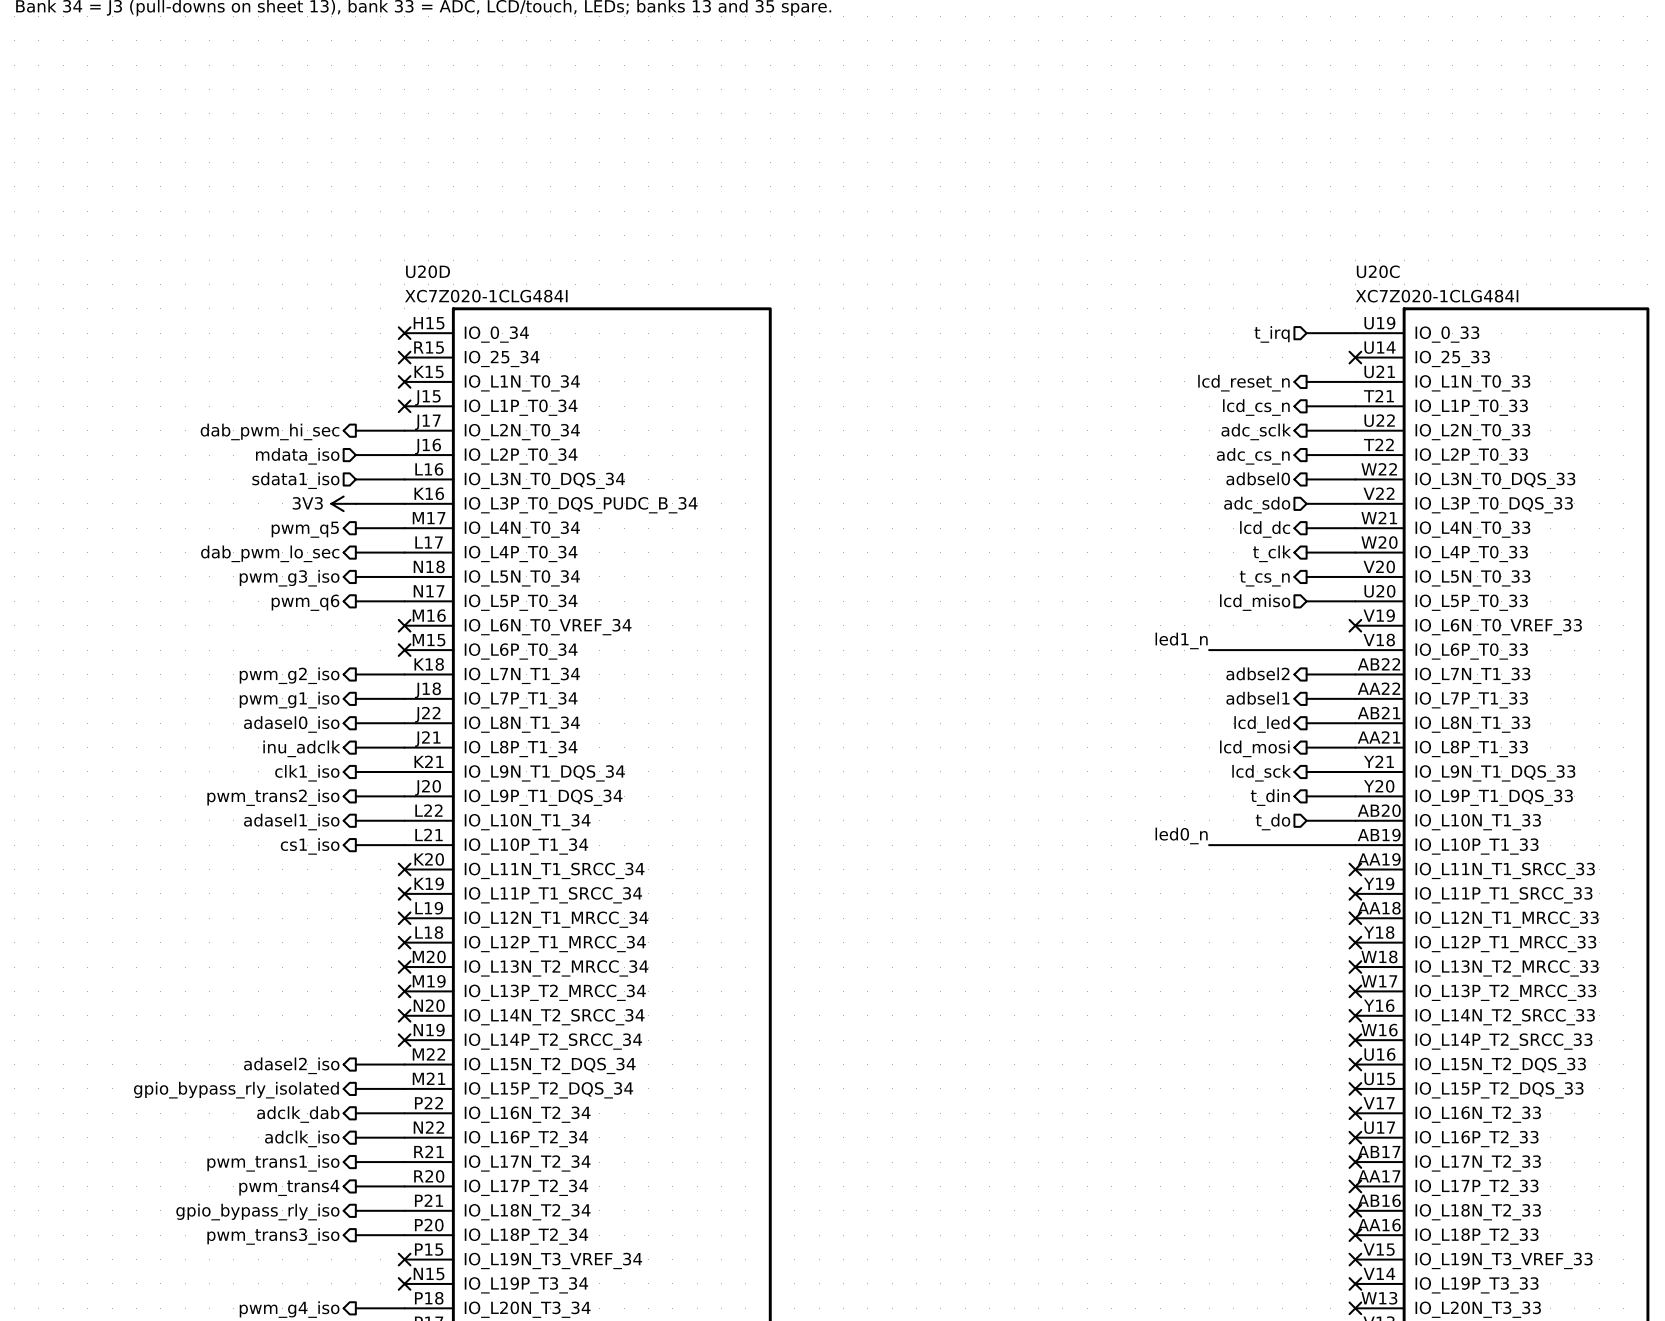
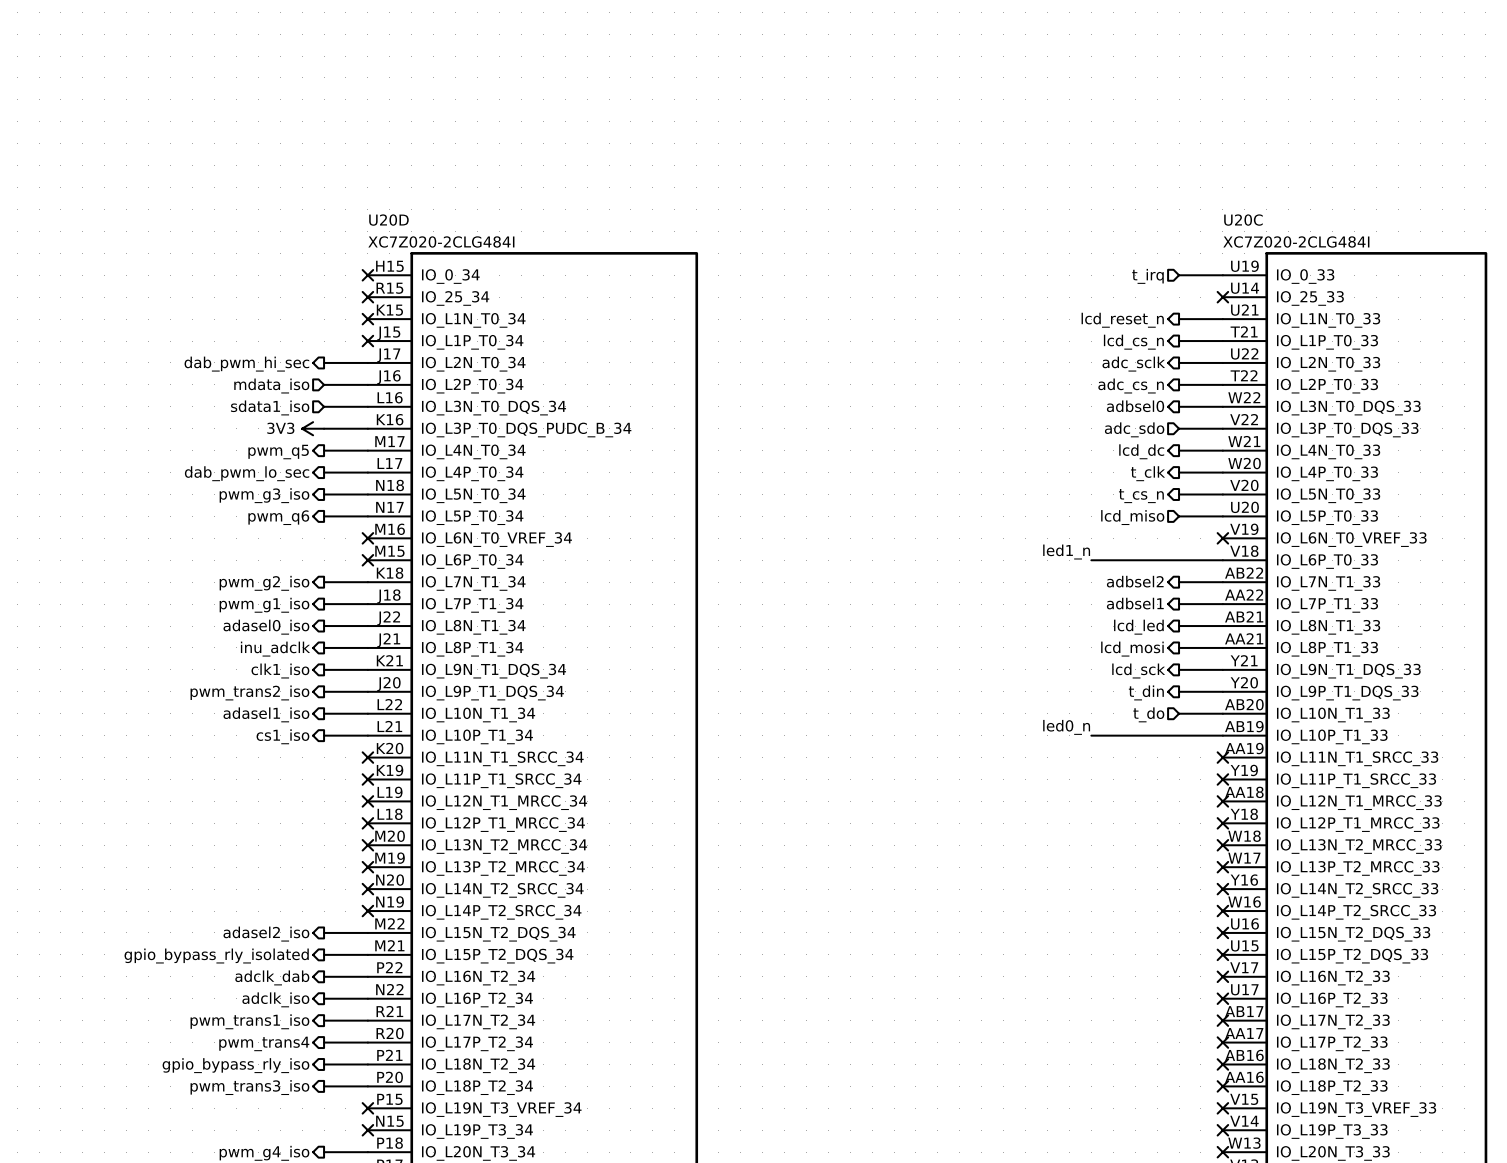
U20D value: XC7Z020-1CLG484I (486, 296) -> XC7Z020-2CLG484I (441, 241)
U20C value: XC7Z020-1CLG484I (1437, 296) -> XC7Z020-2CLG484I (1296, 241)

